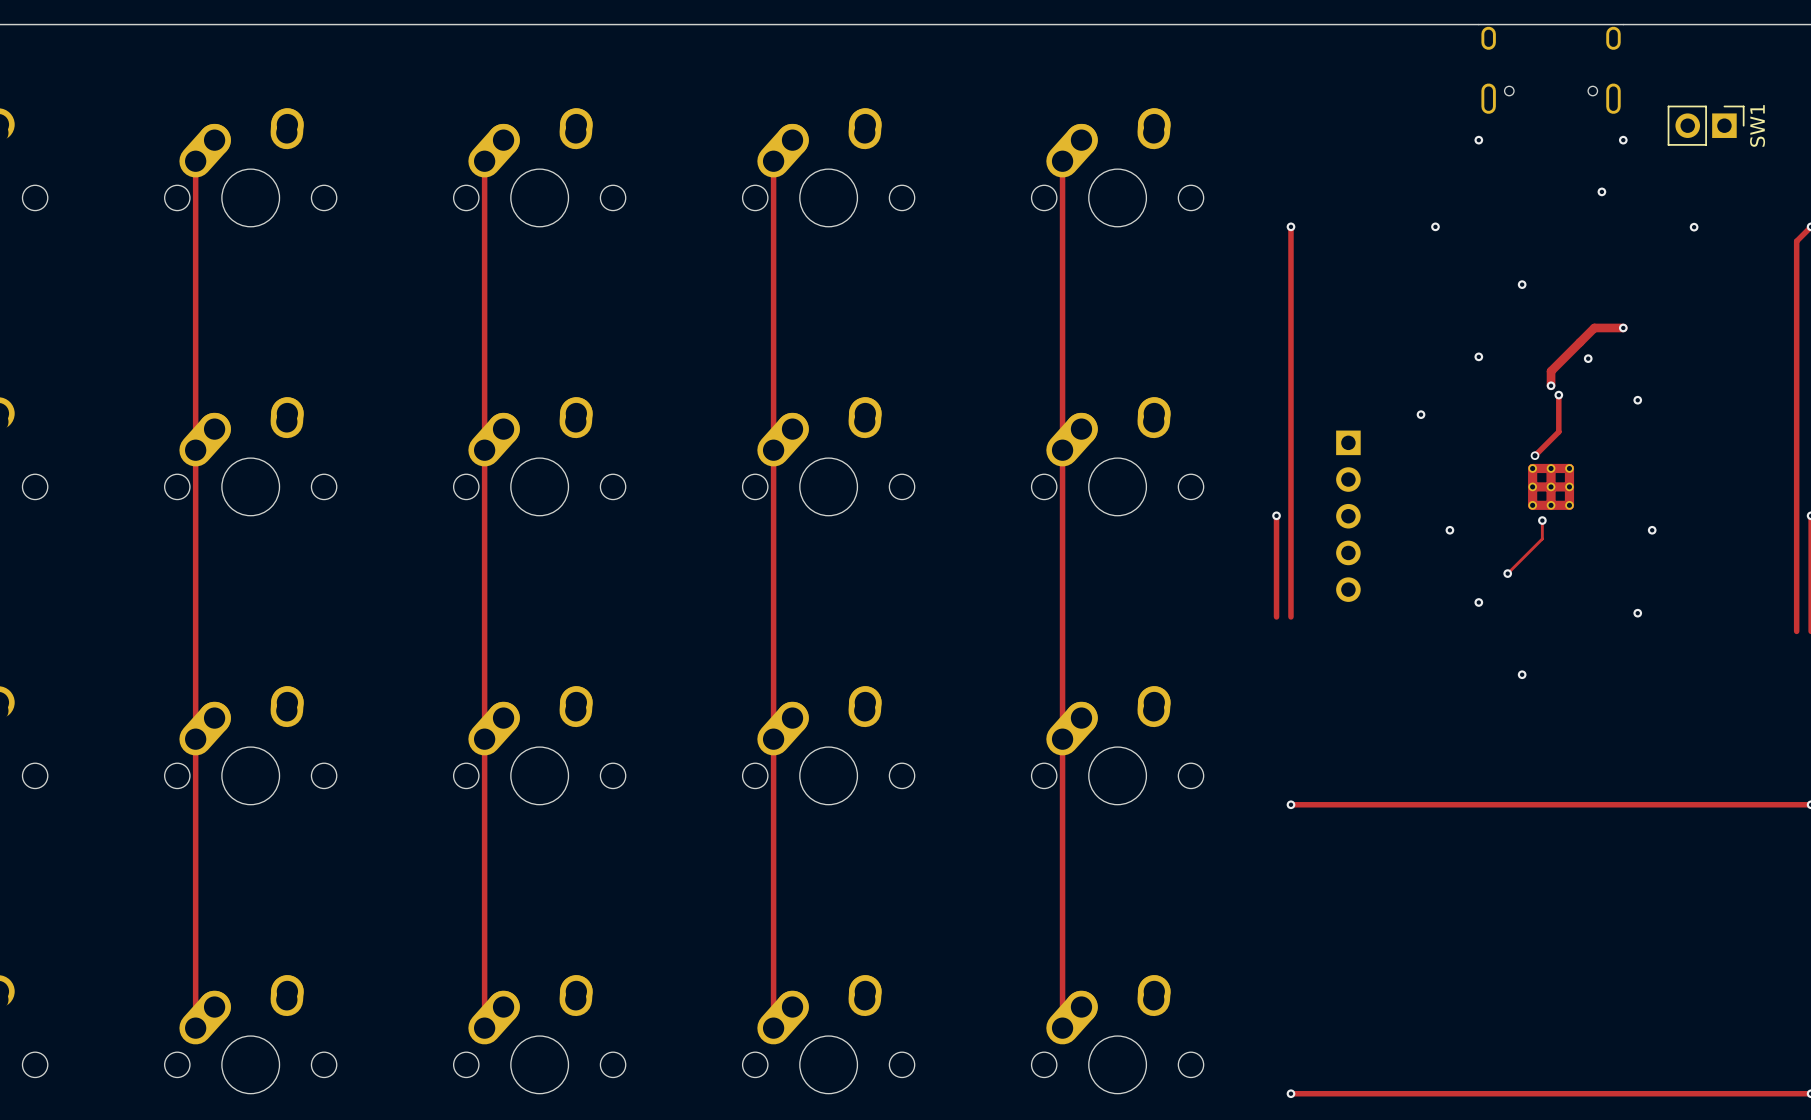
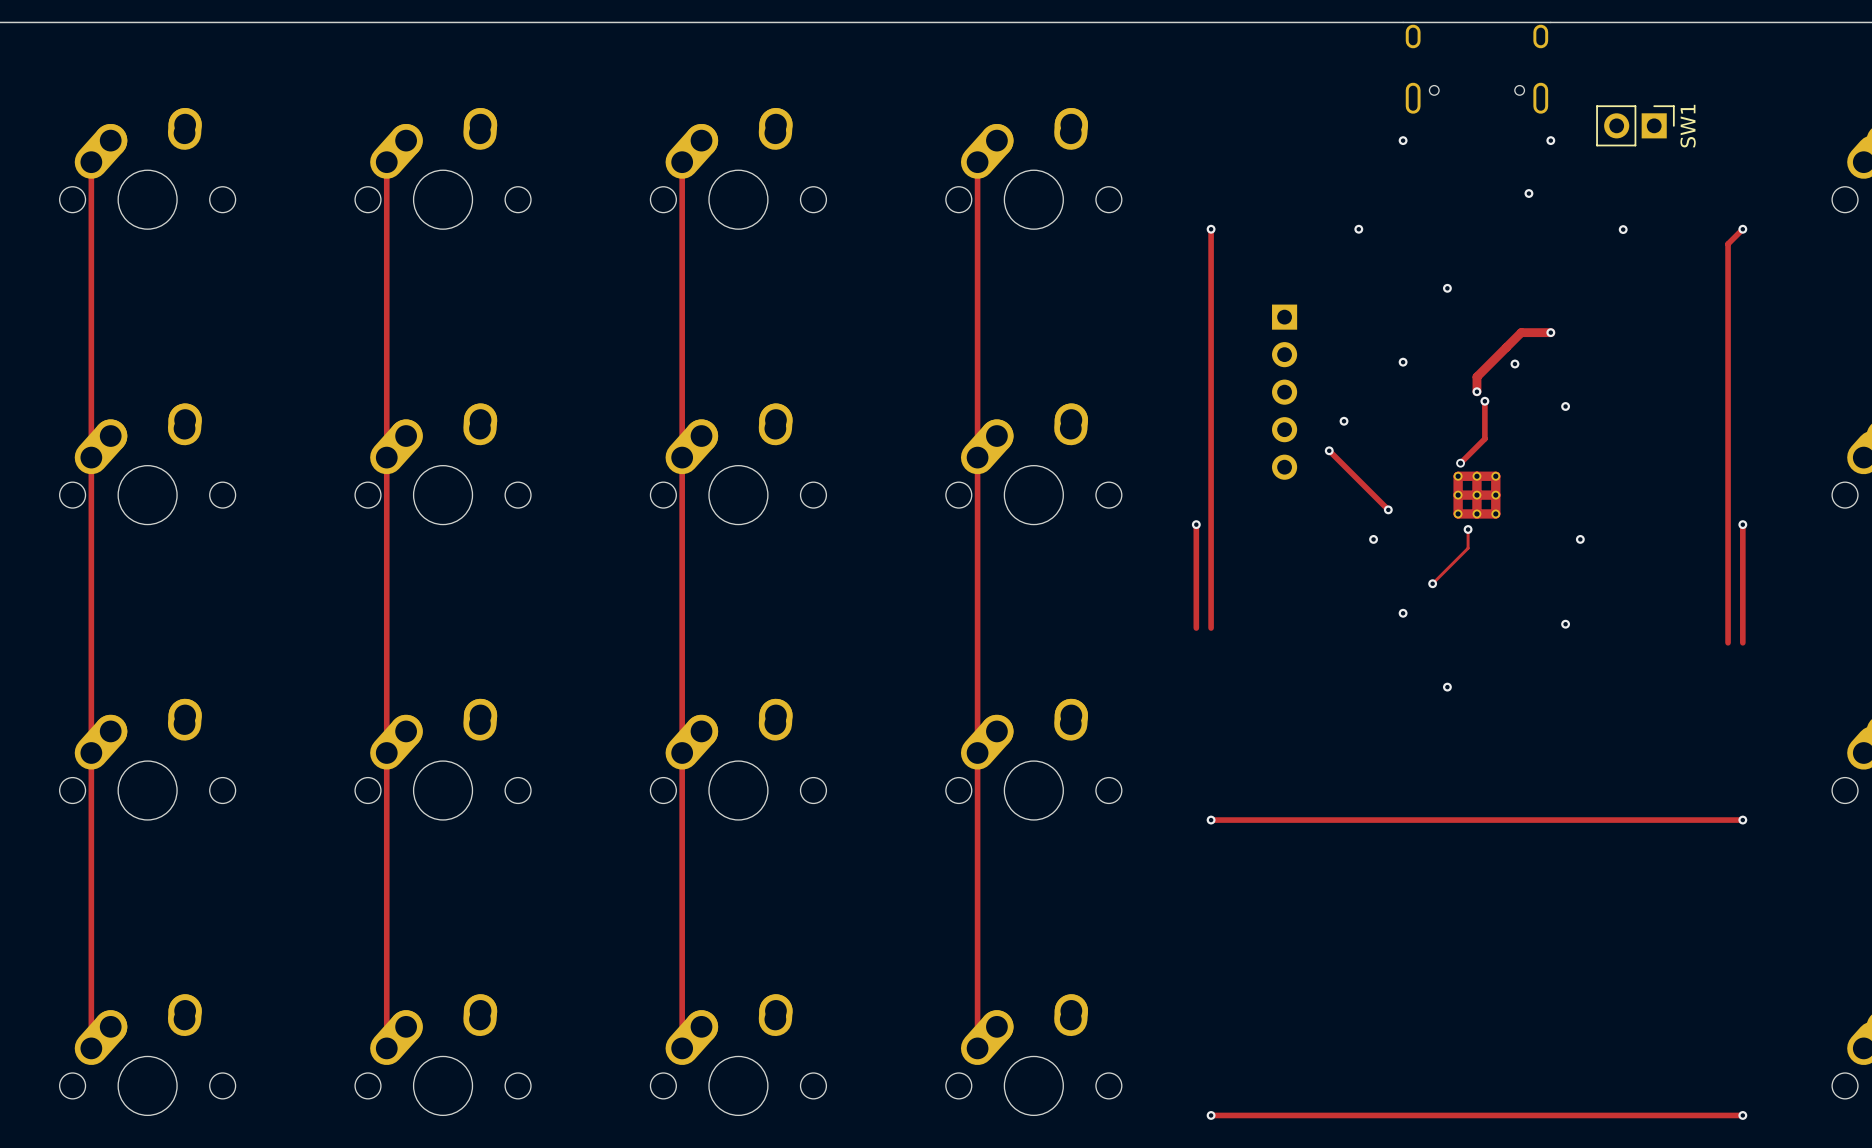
track: none -> (1329, 450) (1388, 509)
via: none -> (1329, 450)
via: none -> (1388, 509)
part position: (1348, 516) -> (1284, 392)

